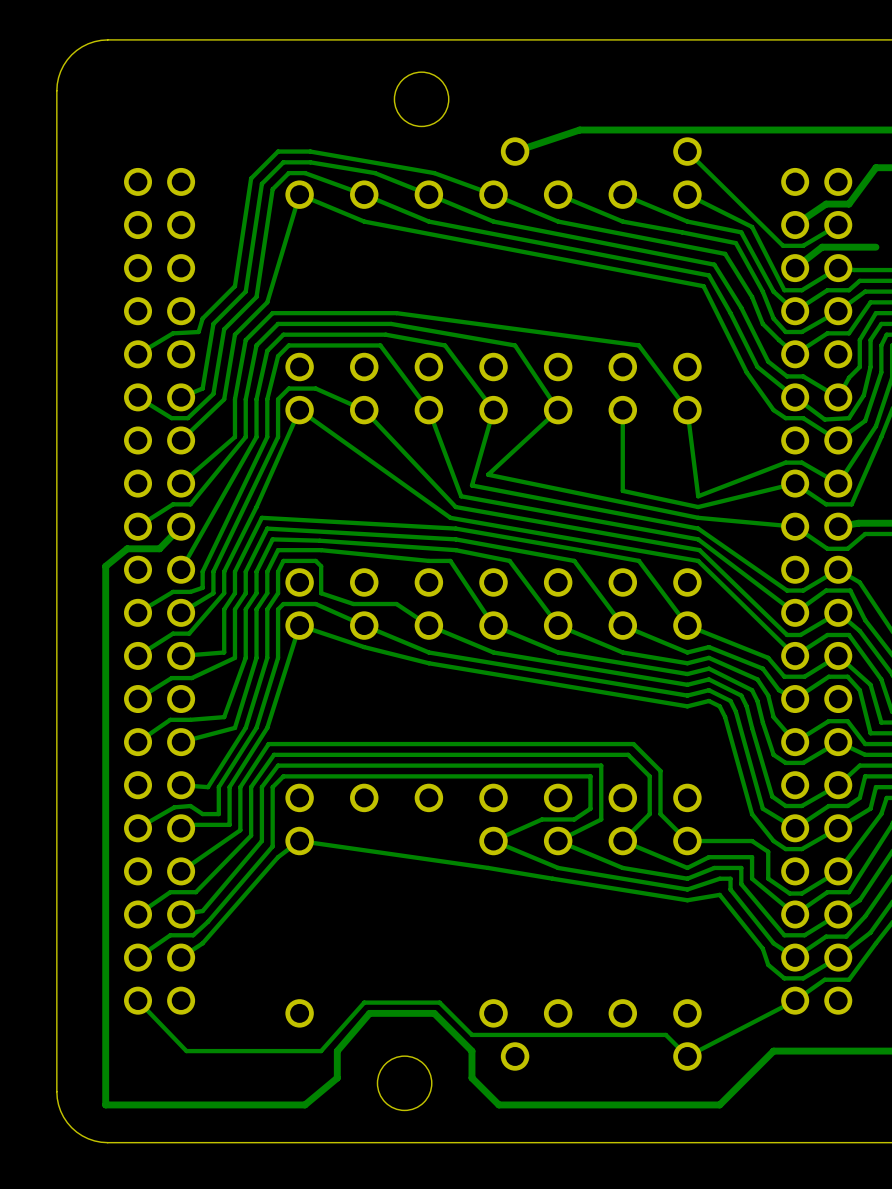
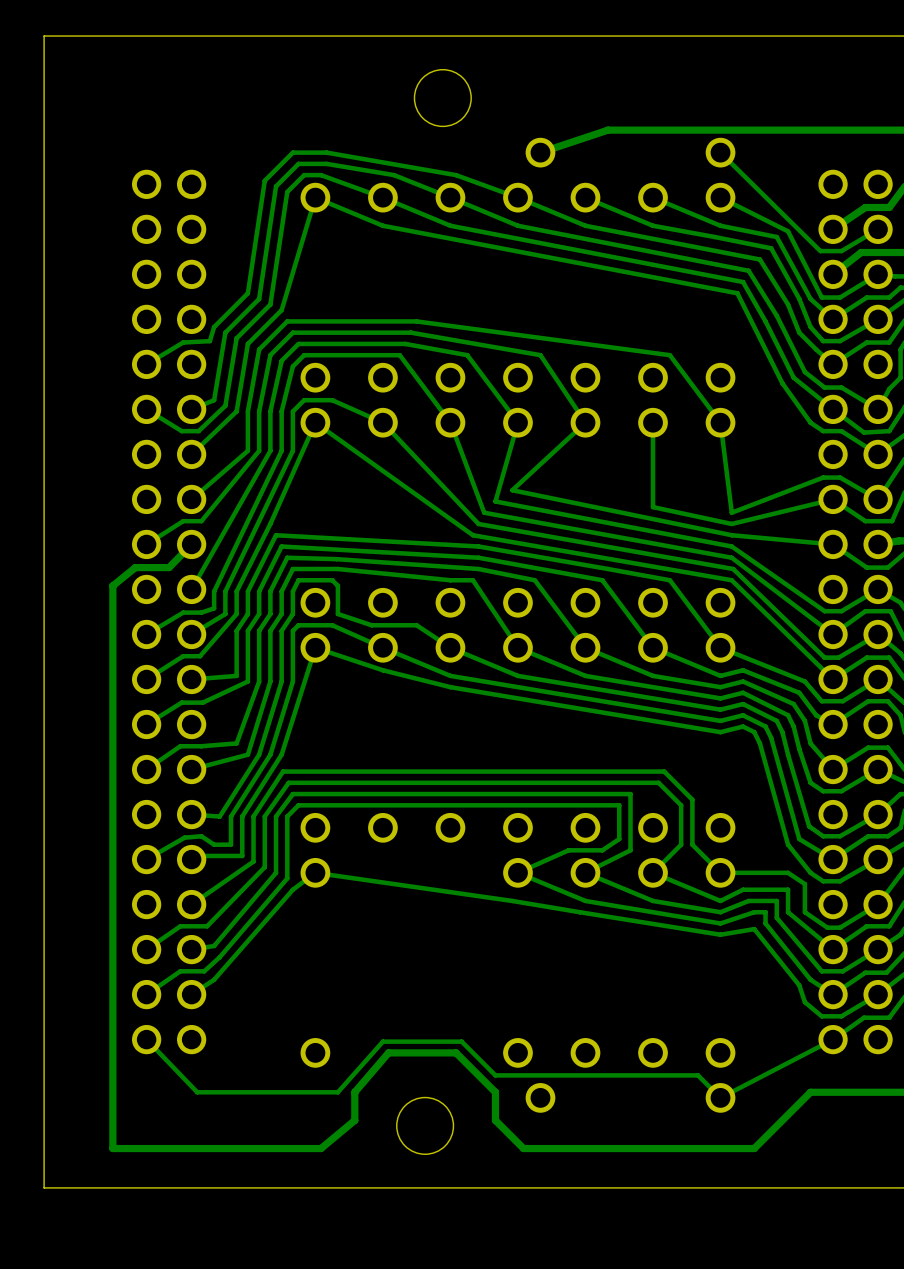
board edge: (107, 39) (88, 43) (71, 54) (60, 71) (56, 90) (56, 1091) (60, 1111) (71, 1127) (88, 1138) (107, 1142) -> (114, 36) (44, 36) (44, 1187) (114, 1187)

